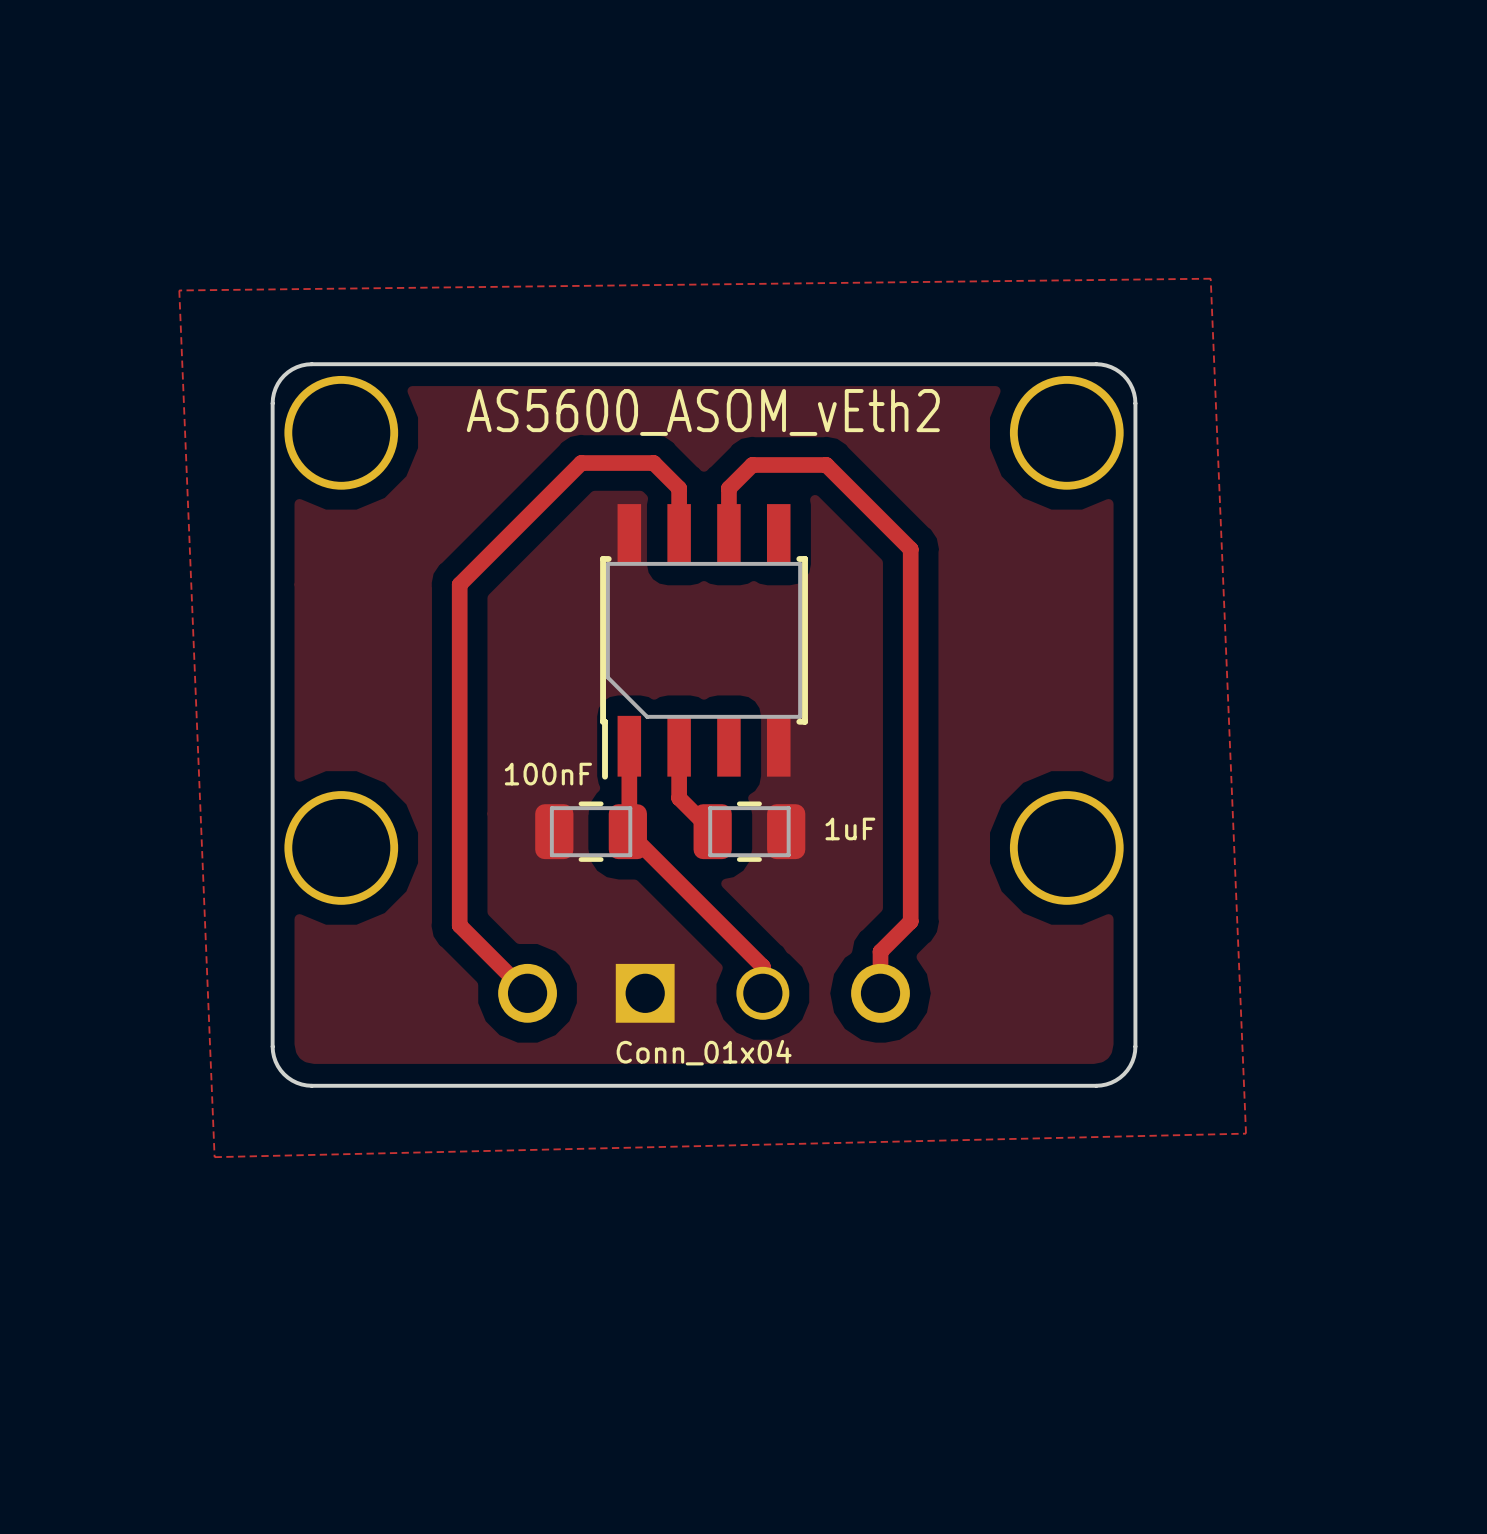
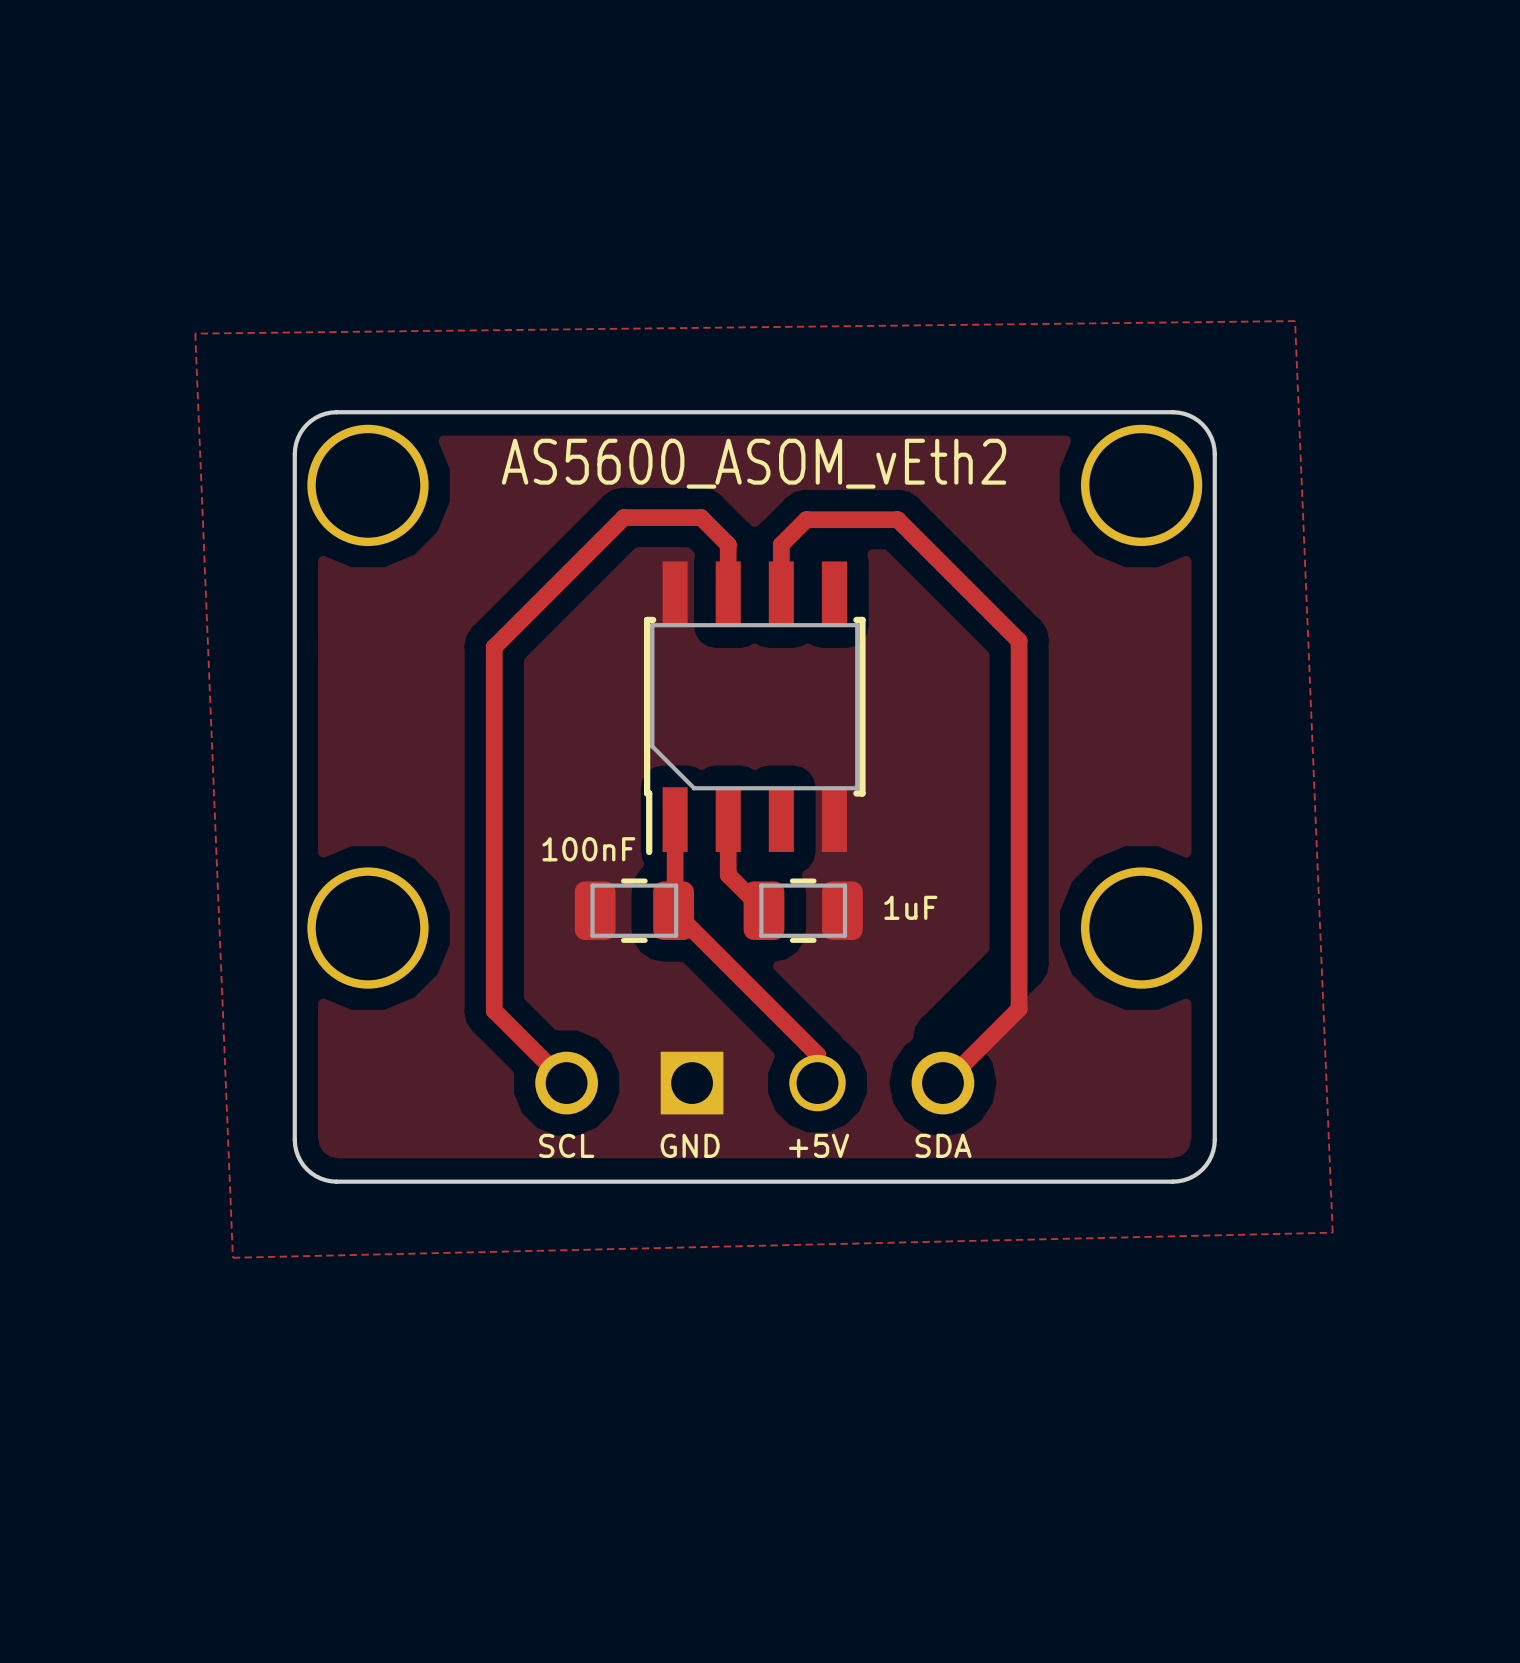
track: (826, 464) (910, 549) (910, 921) (880, 951) (880, 993) -> (885, 519) (897, 519) (1019, 640) (1019, 1008) (942, 1083)
part value: Conn_01x04 (704, 1052) -> SCL GND +5V SDA (755, 1145)

